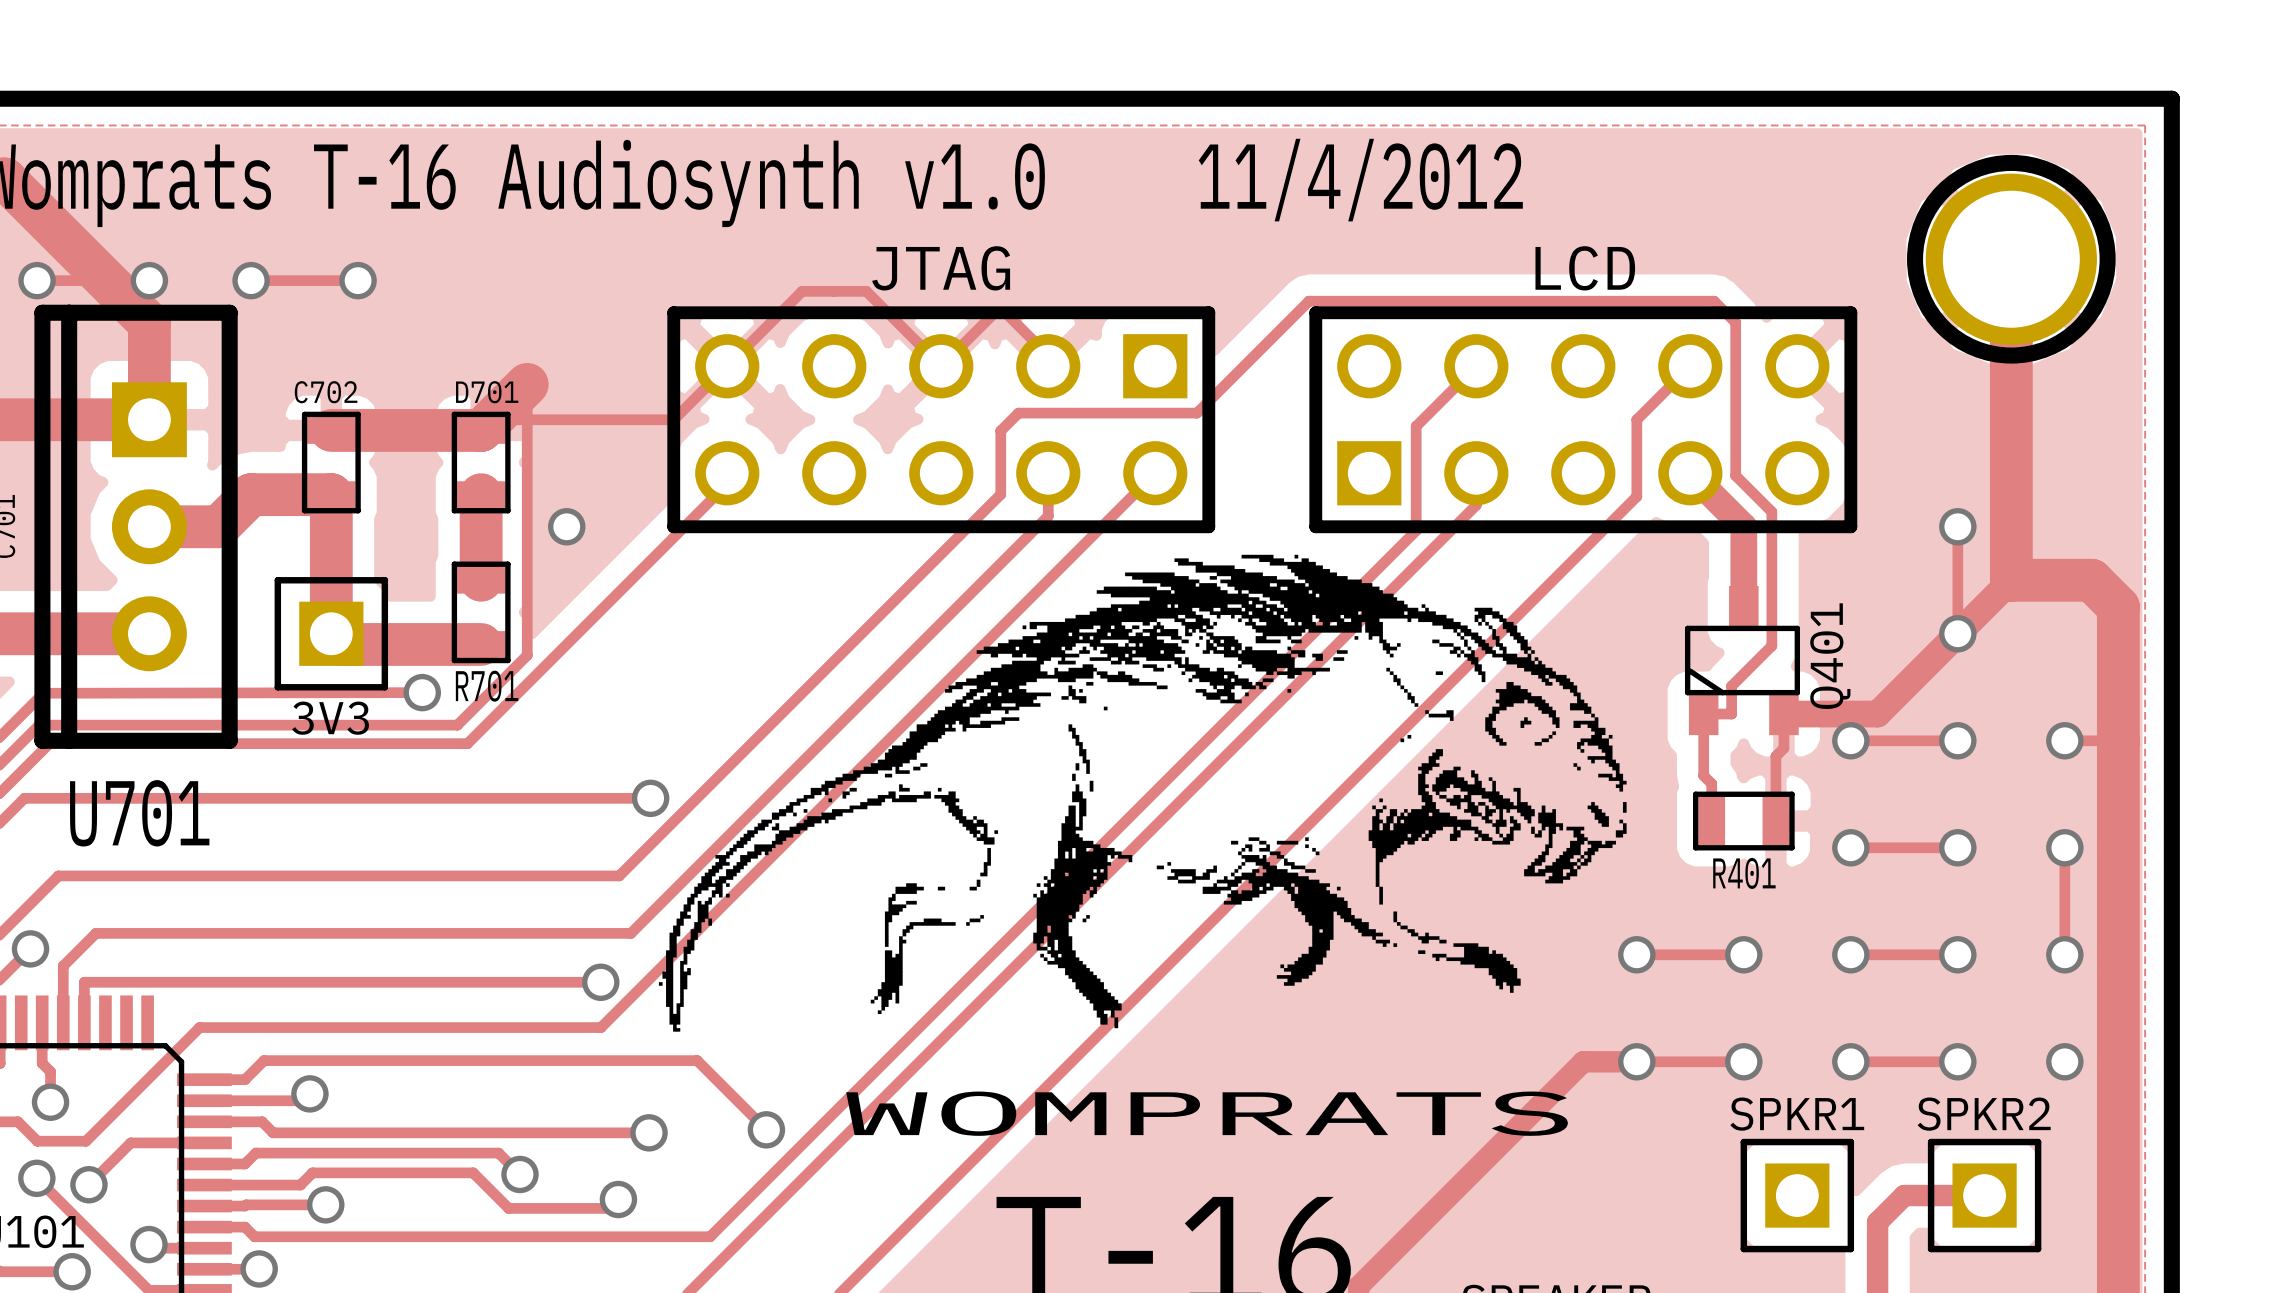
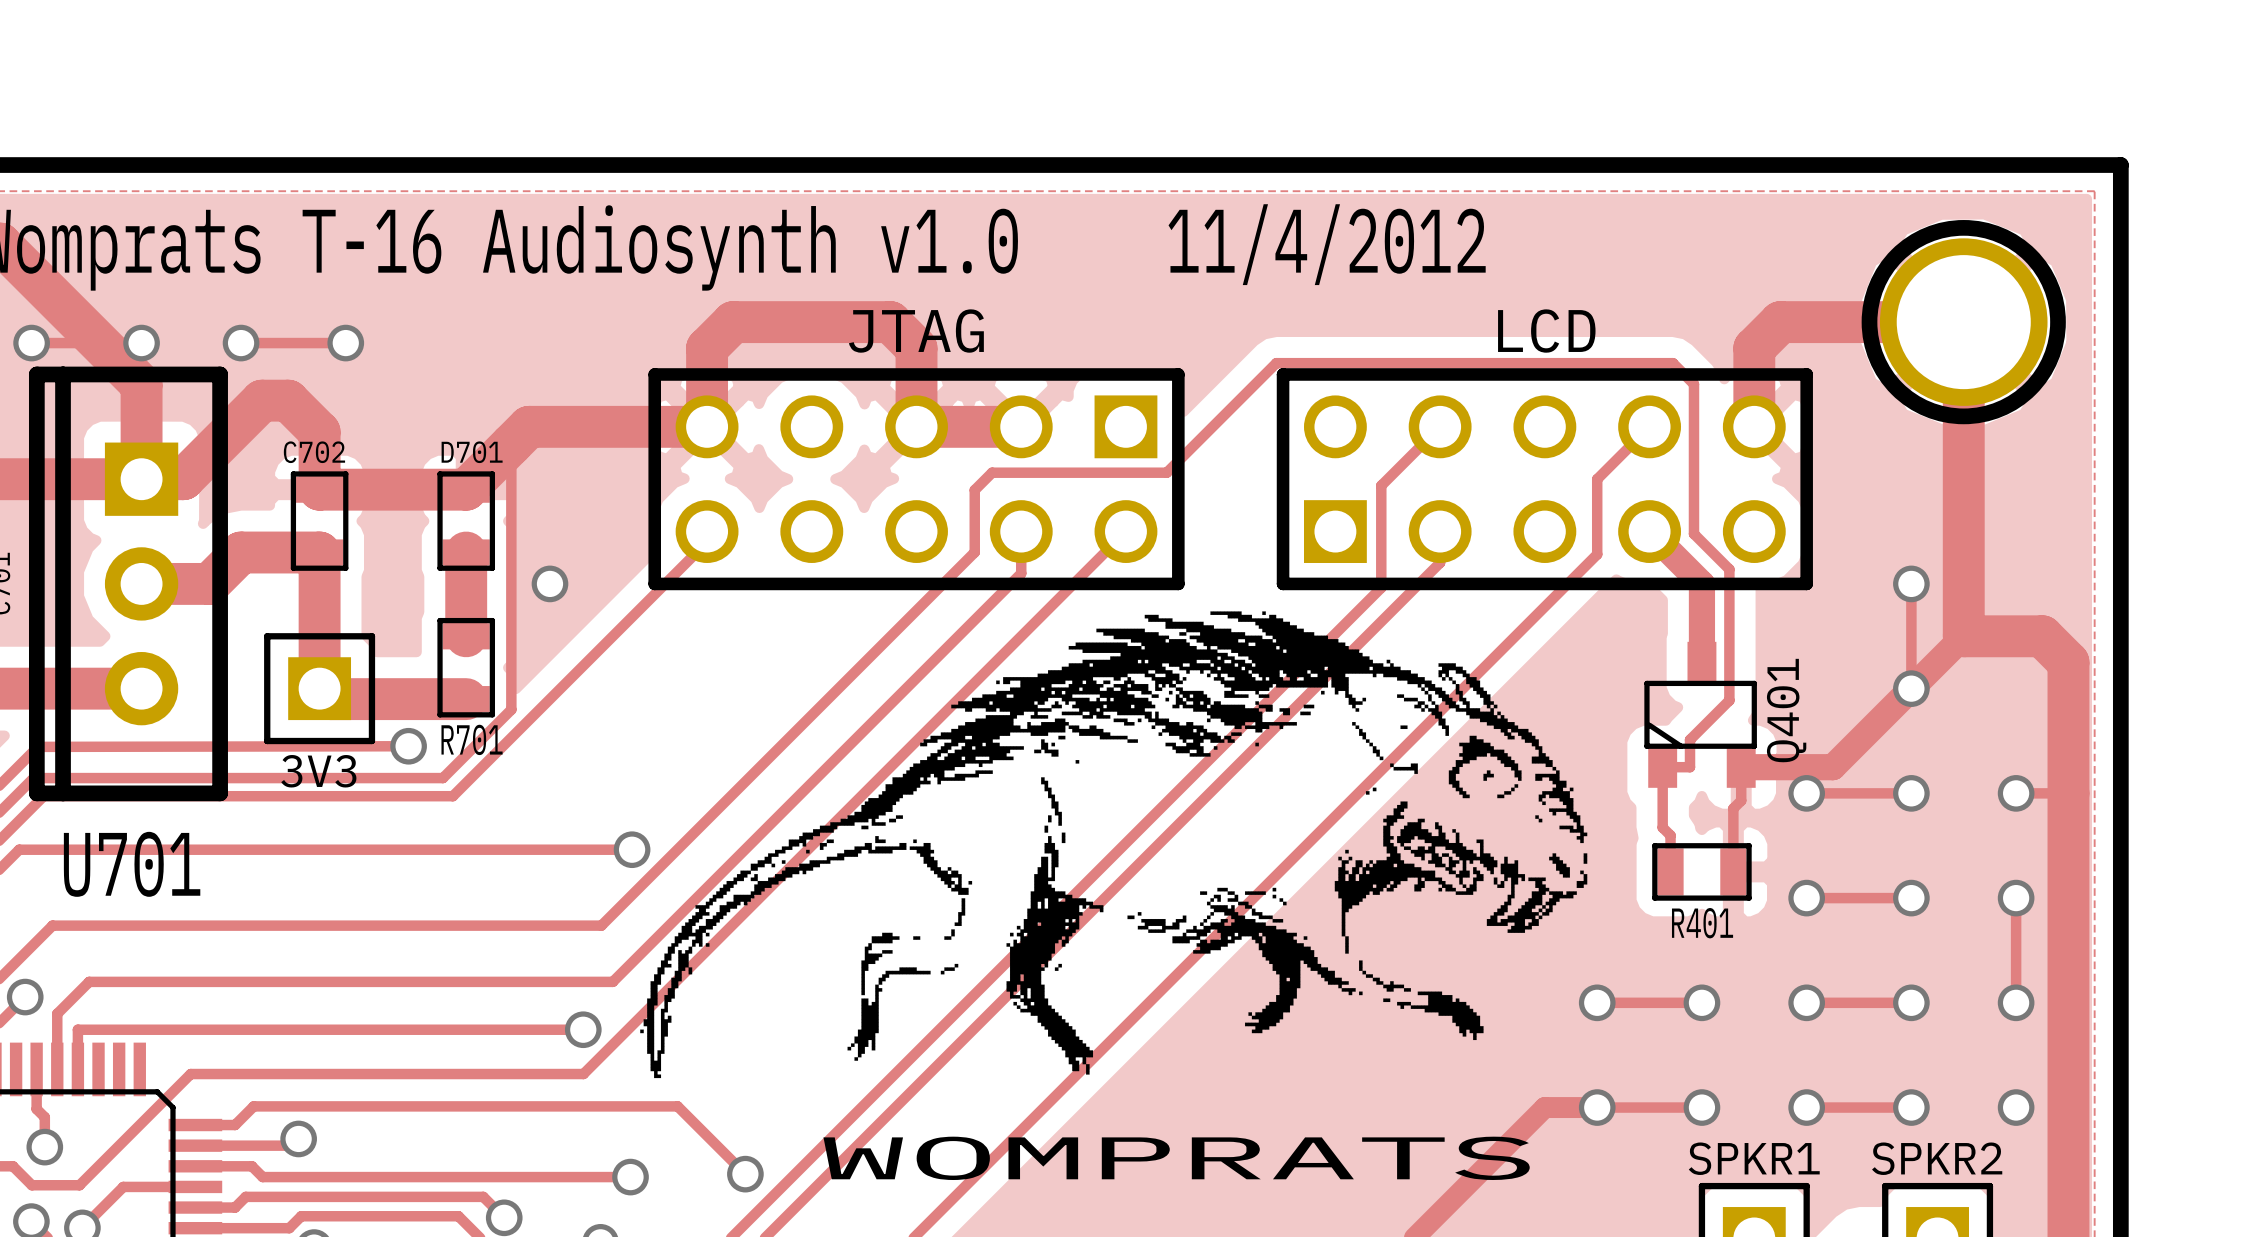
track: none -> (1963, 322) (1780, 322) (1754, 348) (1754, 426)
track: (1048, 366) (1048, 355) (1005, 312) (994, 312) (941, 366) (866, 291) (802, 291) (673, 419) (491, 419) (481, 430) -> (1021, 426) (916, 426) (916, 348) (890, 322) (733, 322) (707, 348) (707, 426) (529, 426) (511, 444)
track: none -> (141, 479) (183, 479) (262, 400) (288, 400) (319, 432) (319, 489)

